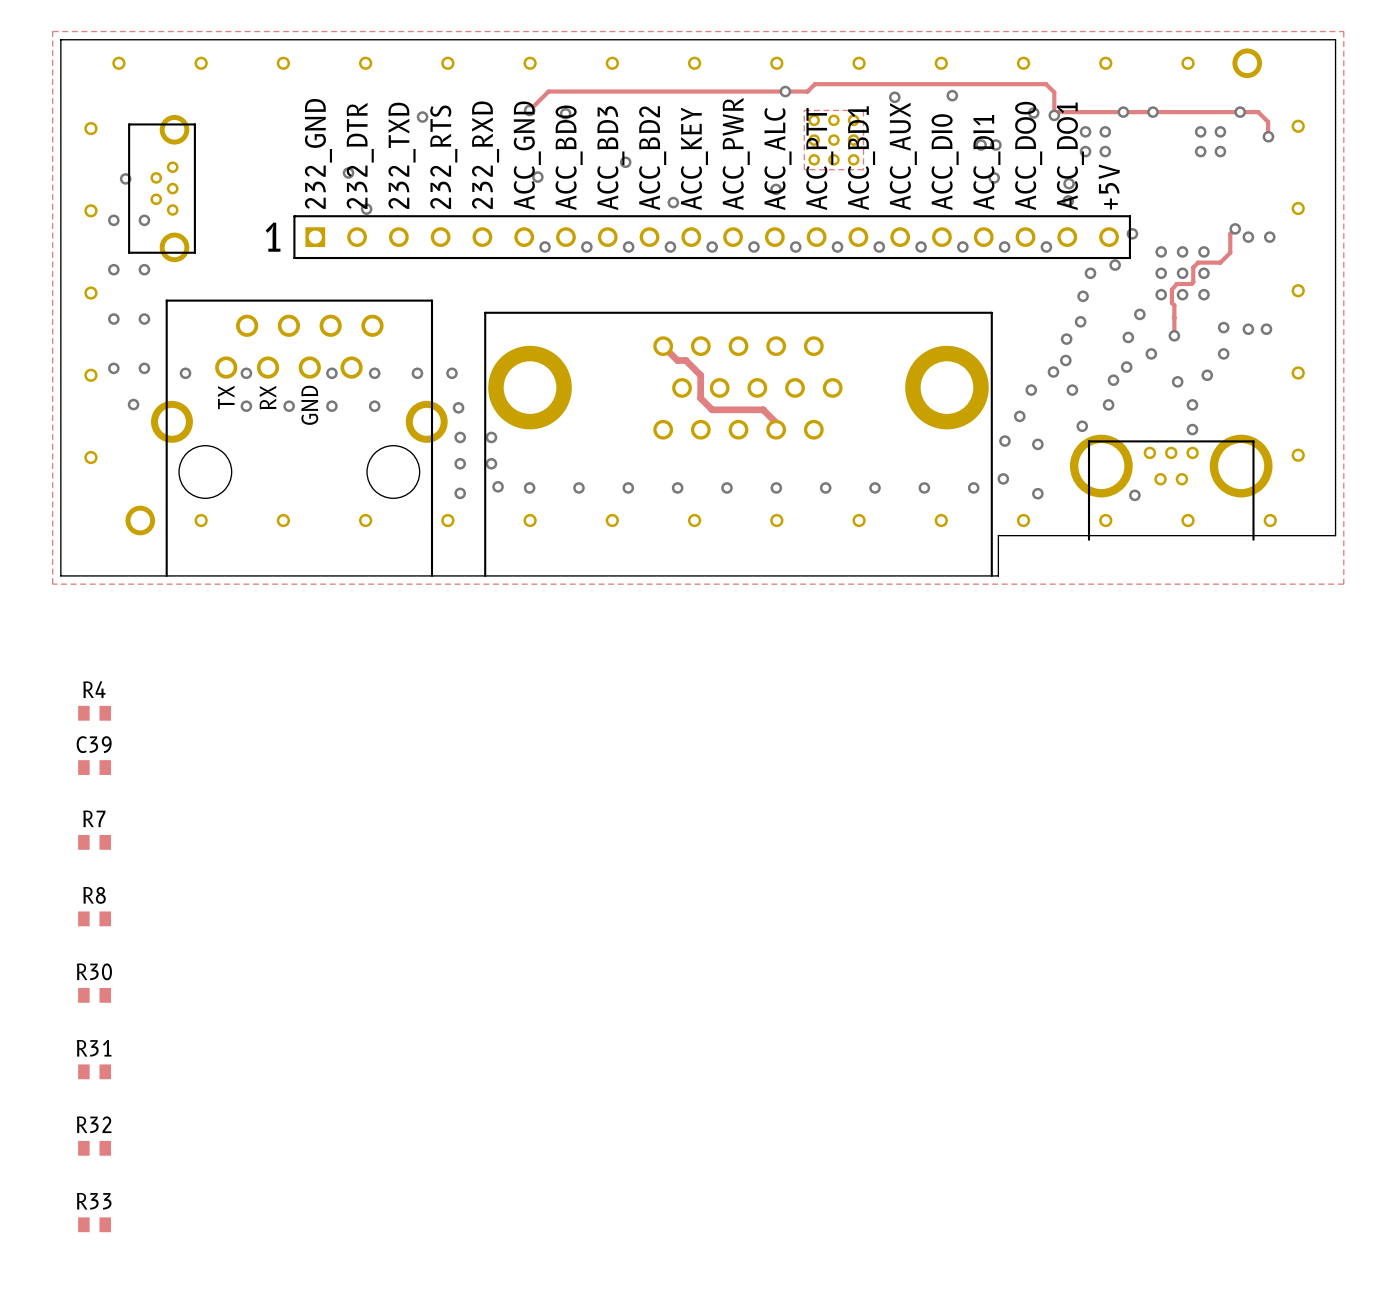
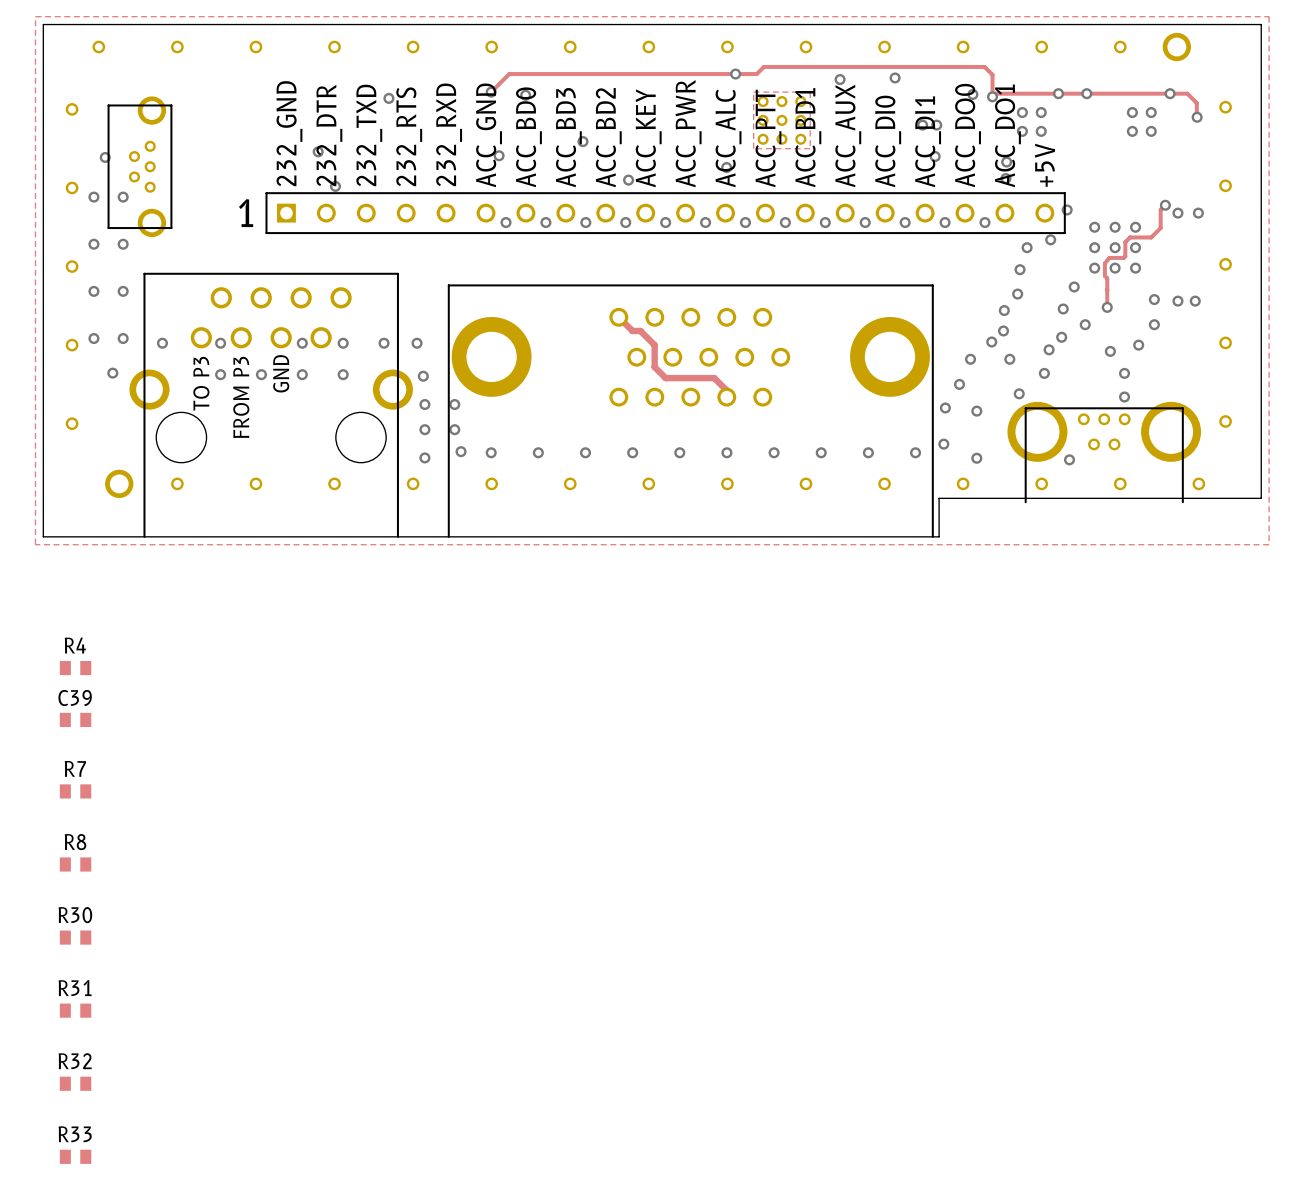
text: TX (226, 397) -> TO P3 (201, 383)
text: RX (267, 397) -> FROM P3 (241, 397)

